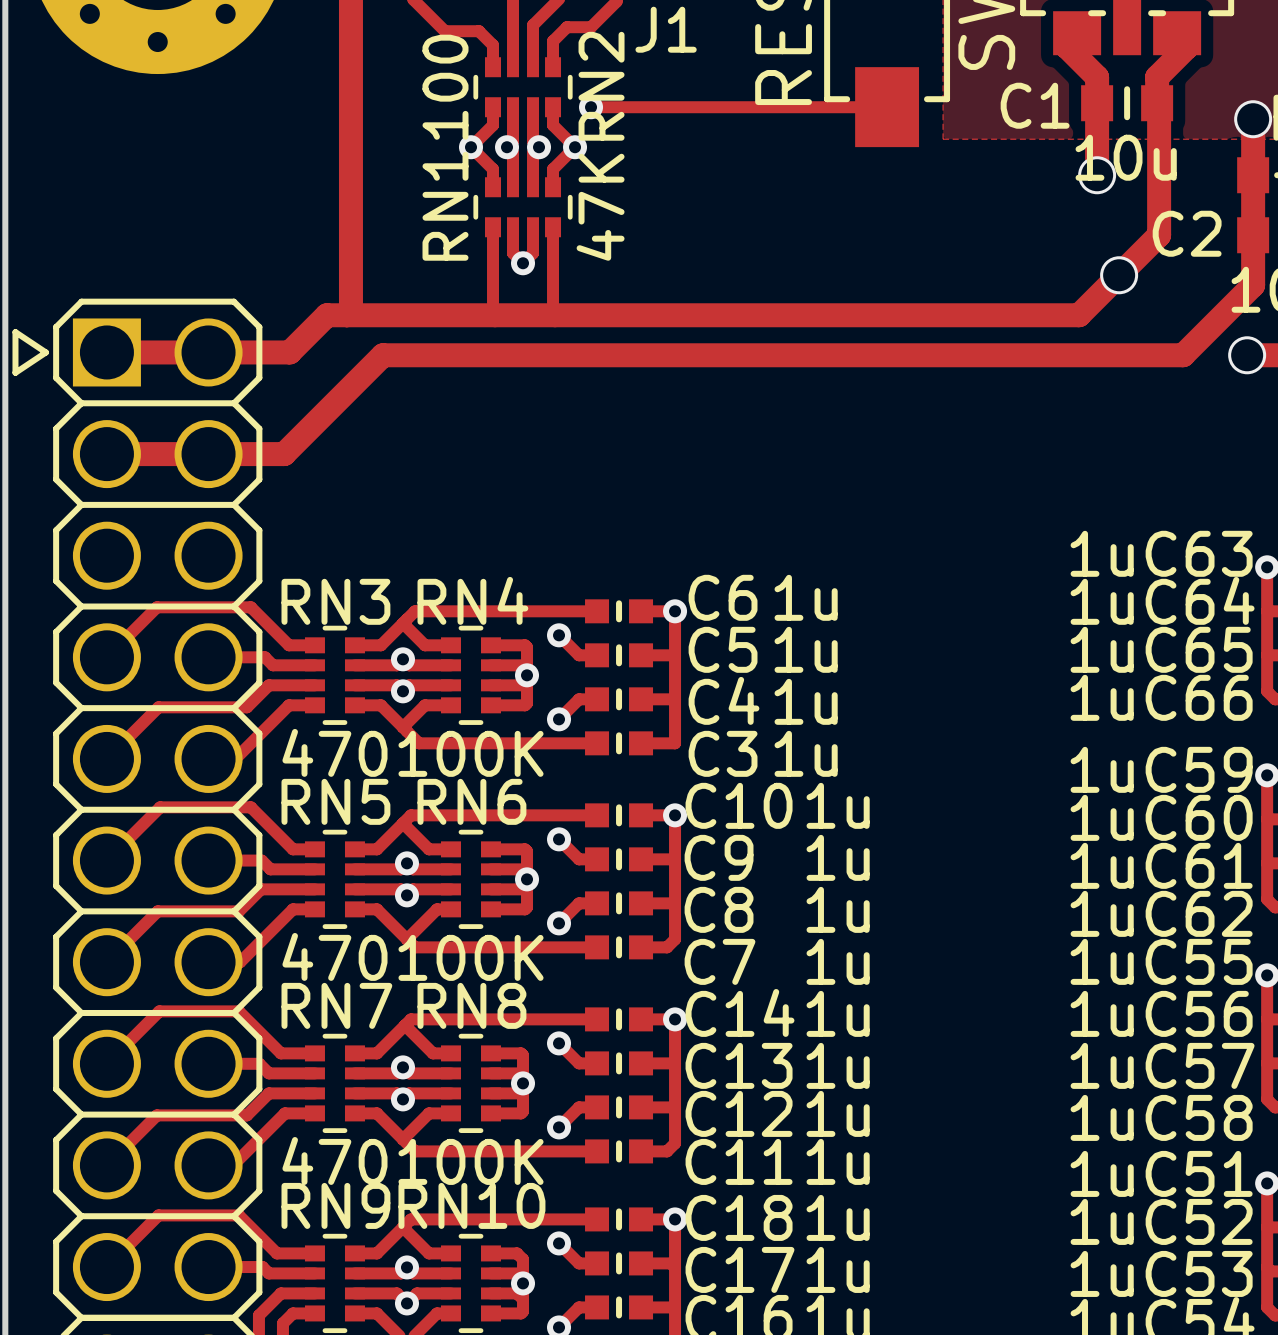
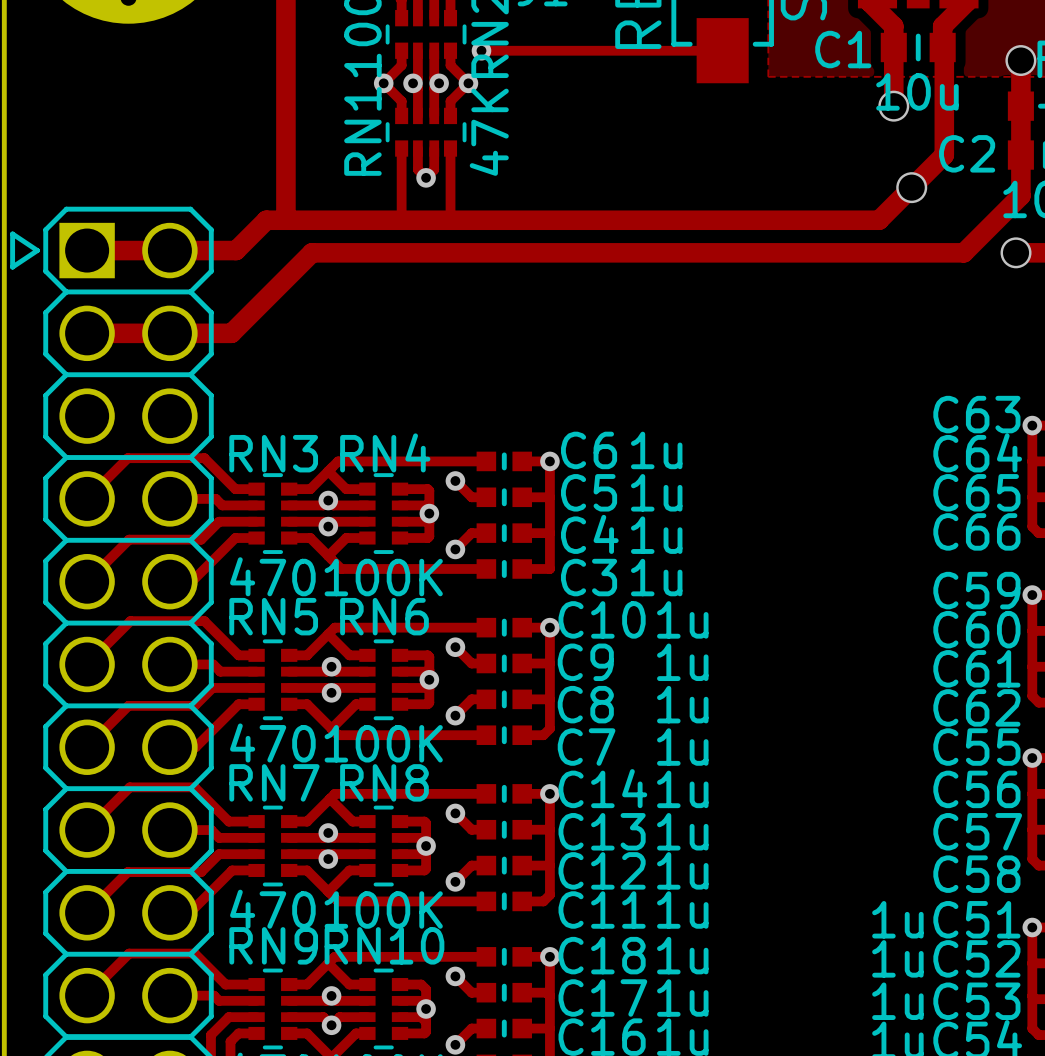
C63 value: 1u (1102, 553) -> none
C64 value: 1u (1102, 601) -> none
C65 value: 1u (1102, 649) -> none
C66 value: 1u (1102, 697) -> none
C59 value: 1u (1102, 769) -> none
C60 value: 1u (1102, 817) -> none
C61 value: 1u (1102, 865) -> none
C62 value: 1u (1102, 913) -> none
C55 value: 1u (1102, 961) -> none
C56 value: 1u (1102, 1013) -> none
C57 value: 1u (1102, 1065) -> none
C58 value: 1u (1102, 1117) -> none

